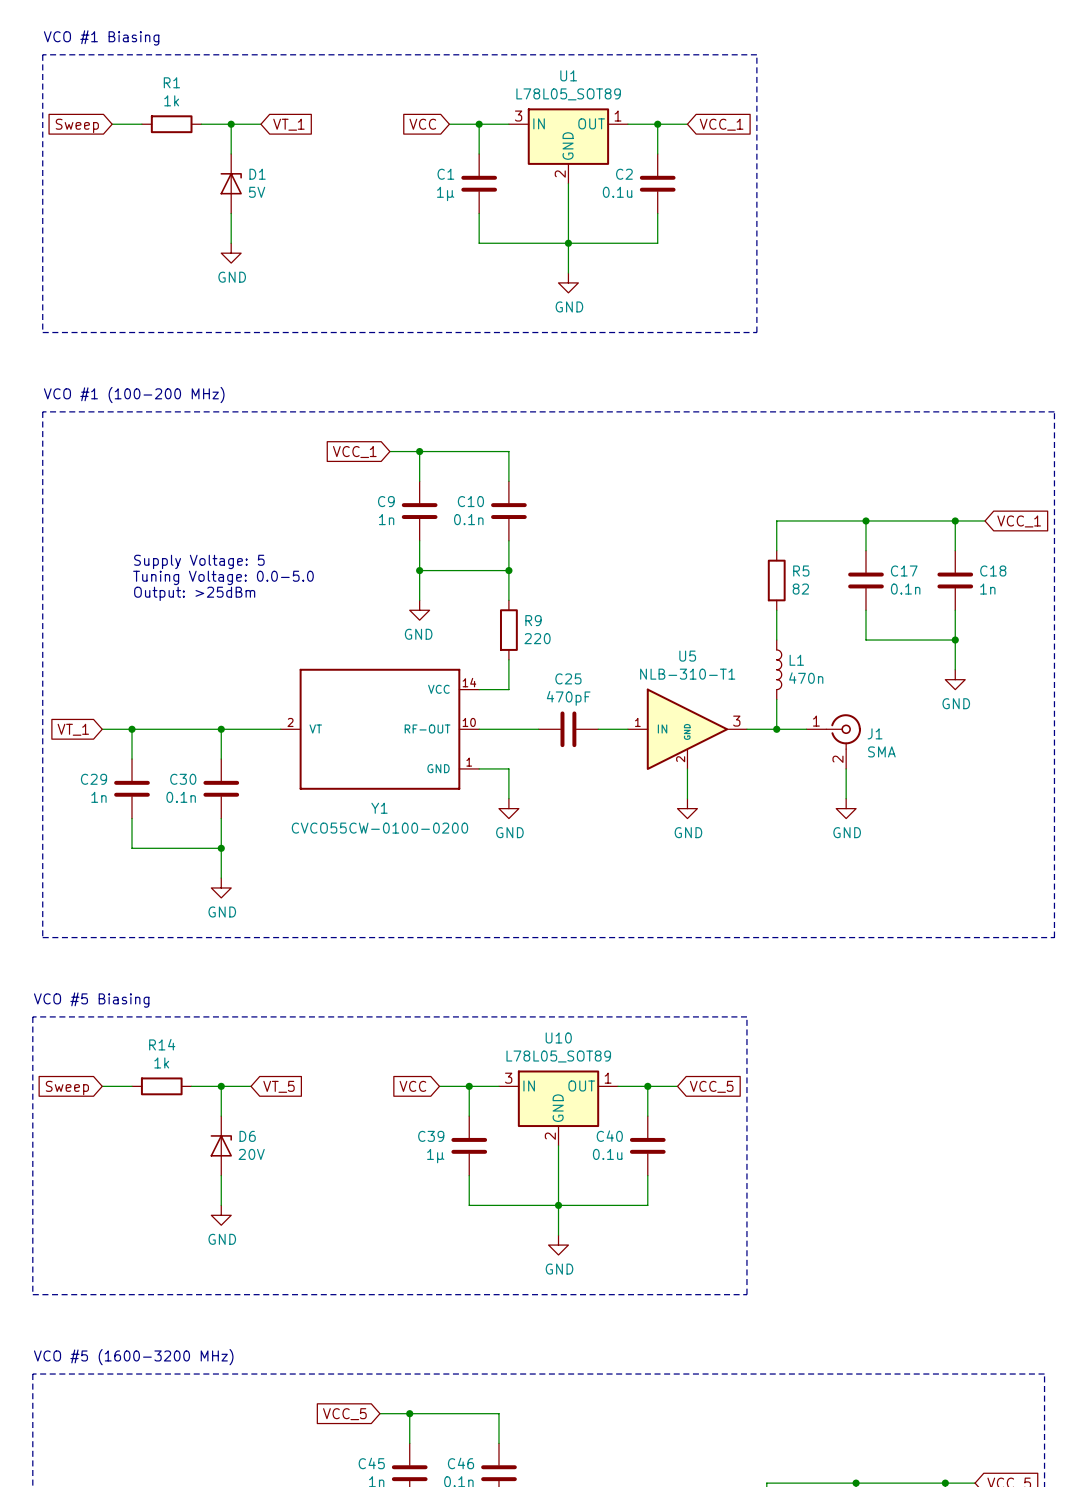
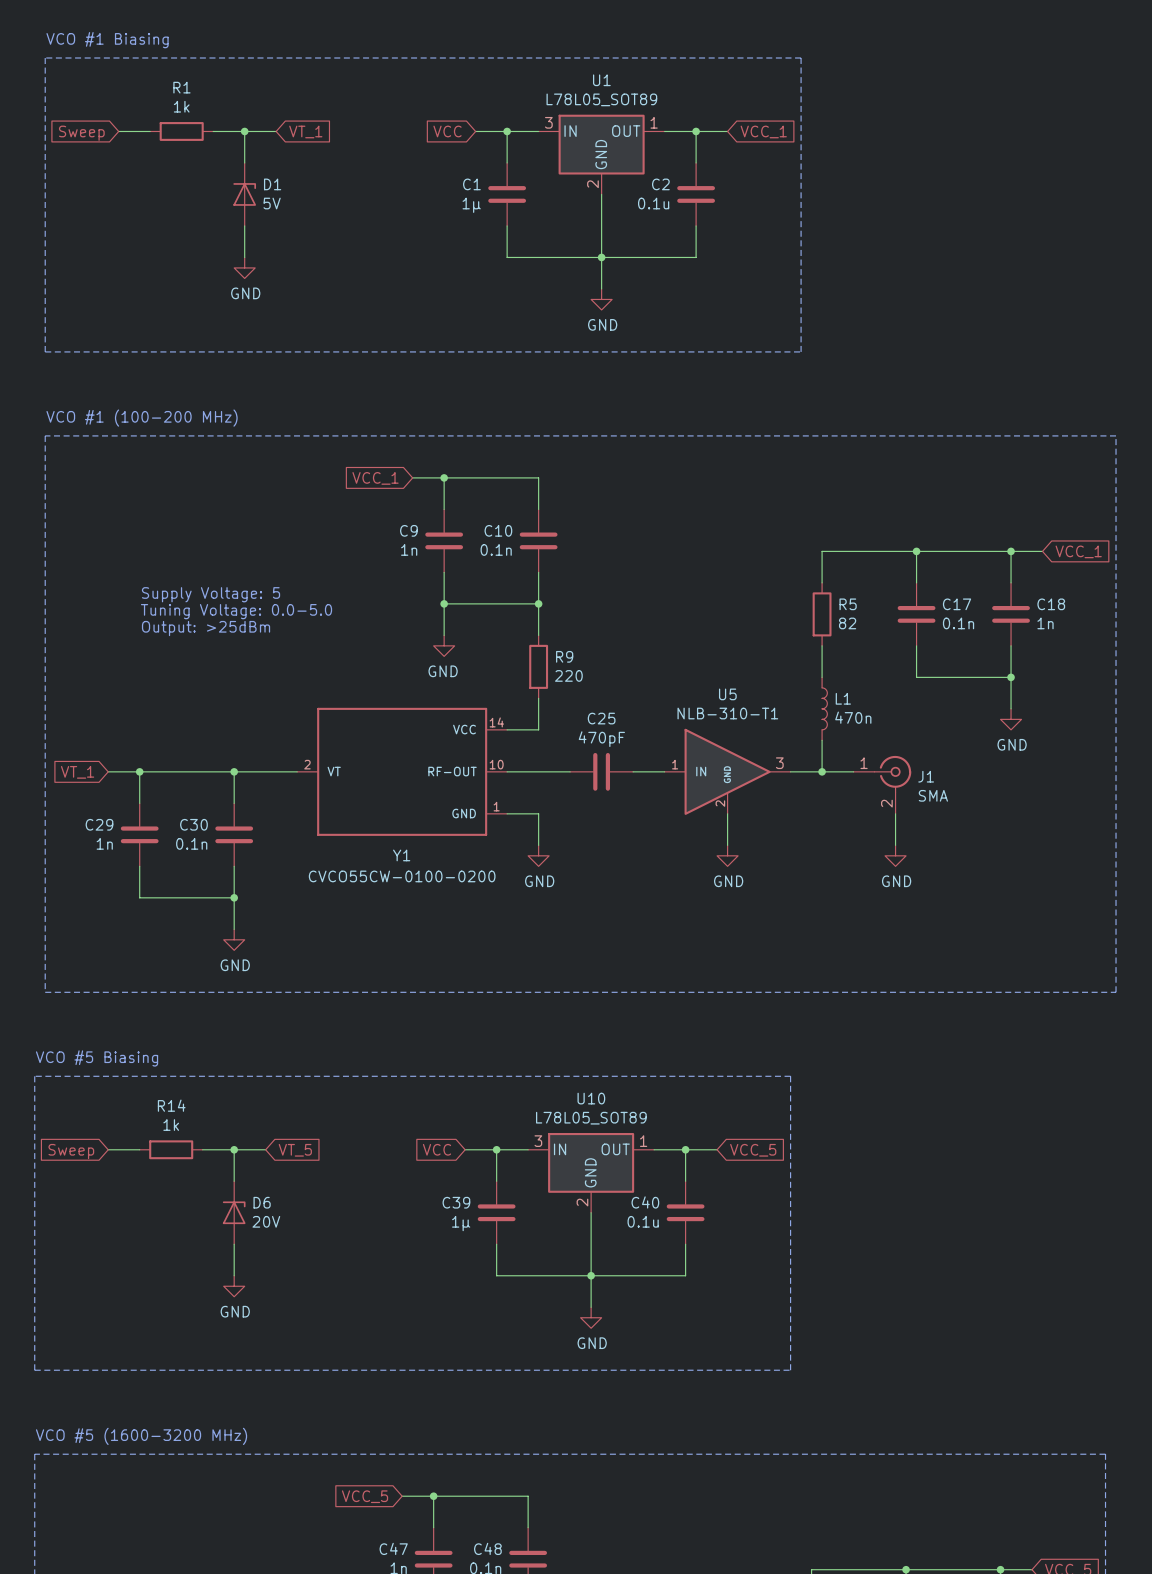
C45 name: C45 (371, 1463) -> C47 (393, 1548)
C46 name: C46 (460, 1463) -> C48 (487, 1548)

